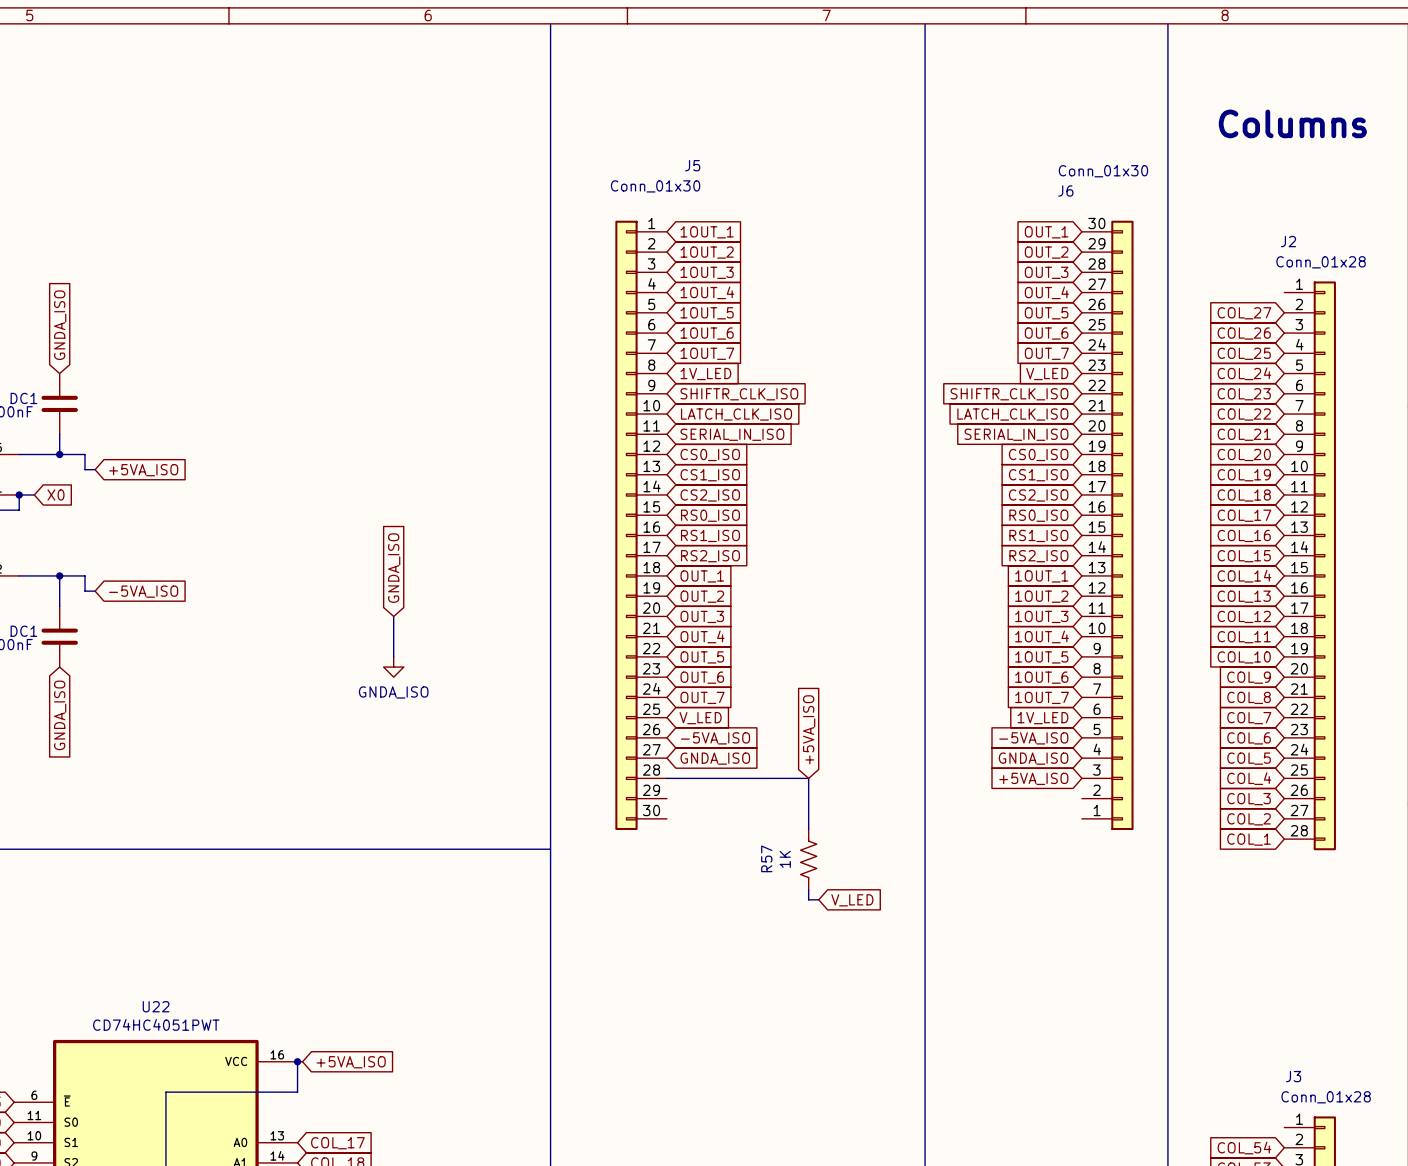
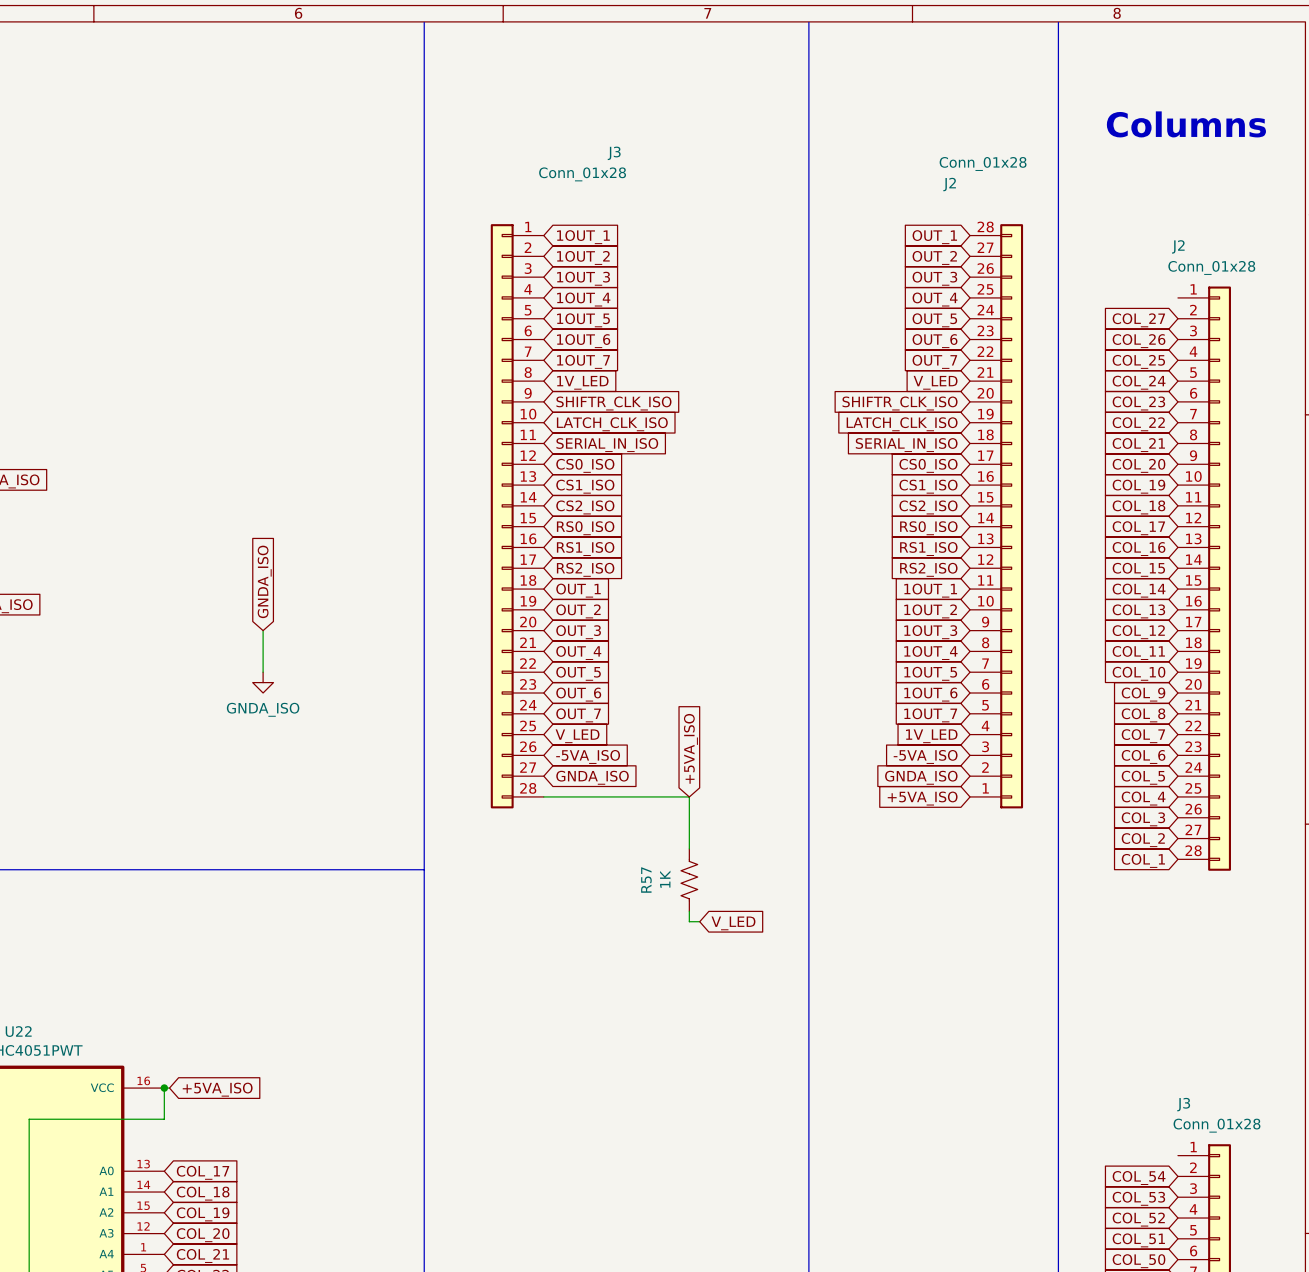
J3: none -> Conn_01x28 (517, 516)
J2: none -> Conn_01x28 (996, 516)
J5: Conn_01x30 (641, 525) -> none
J6: Conn_01x30 (1107, 525) -> none

